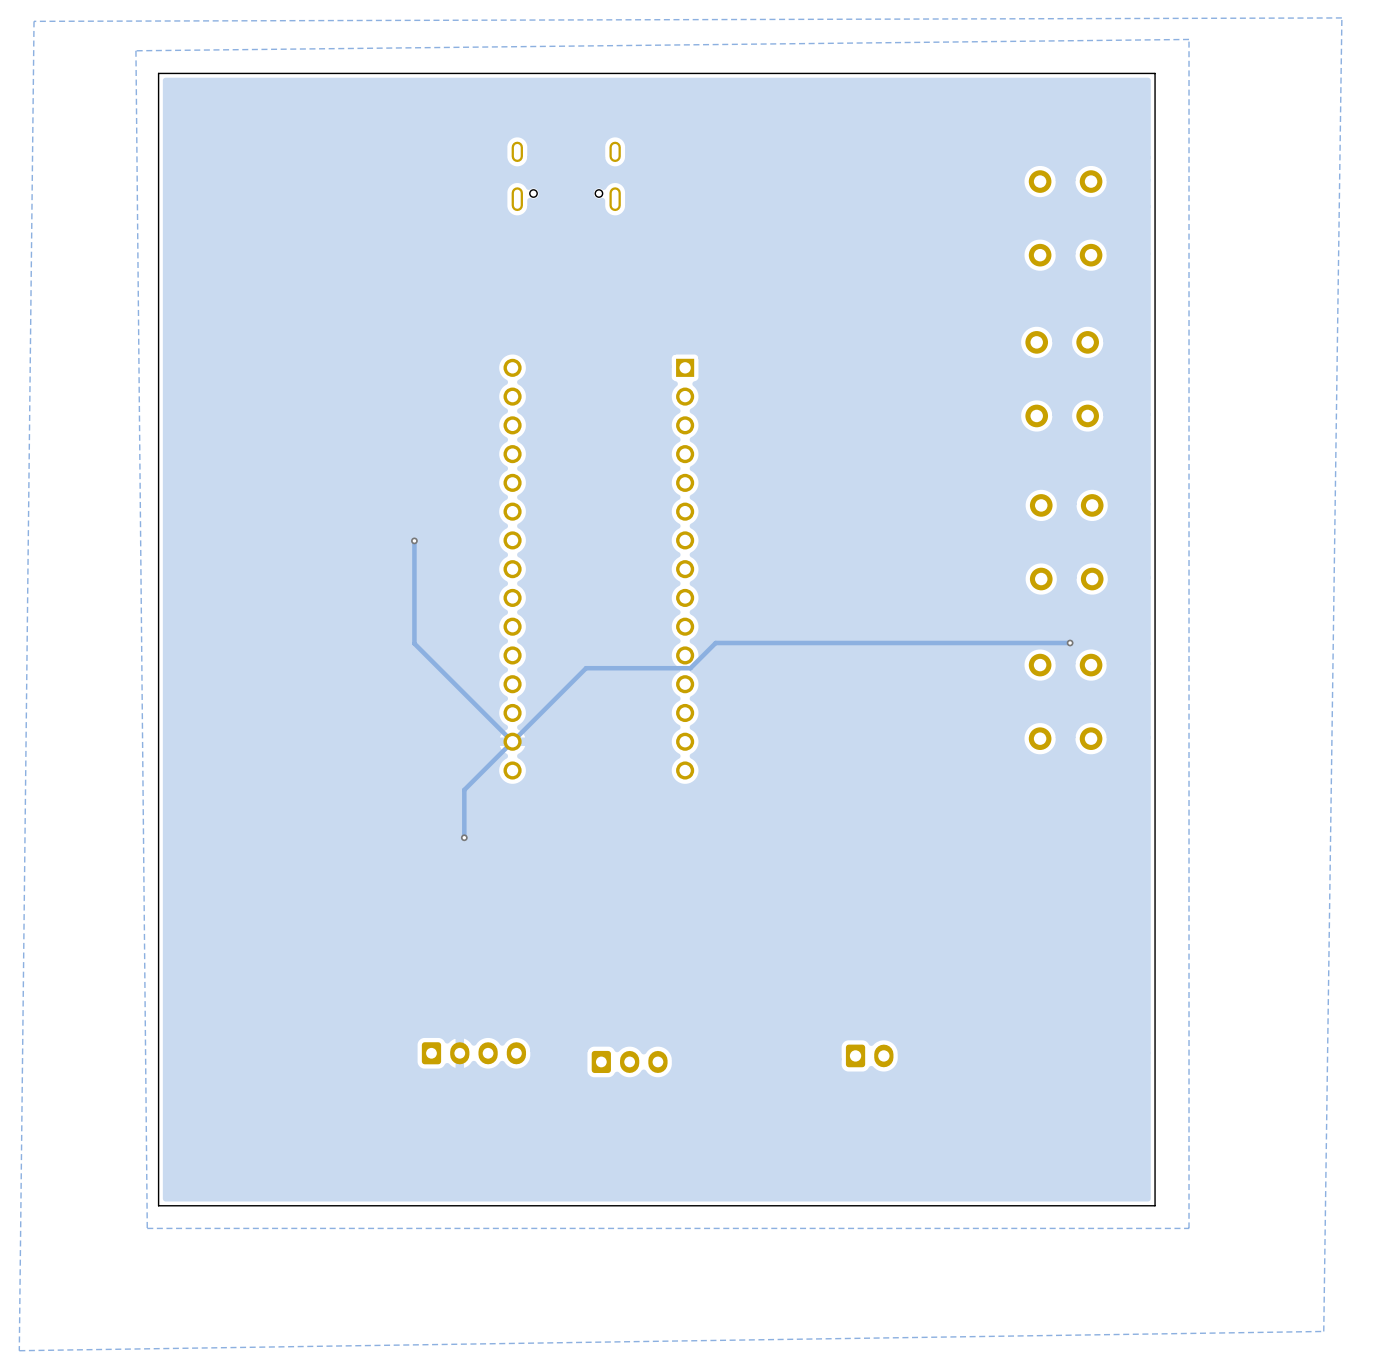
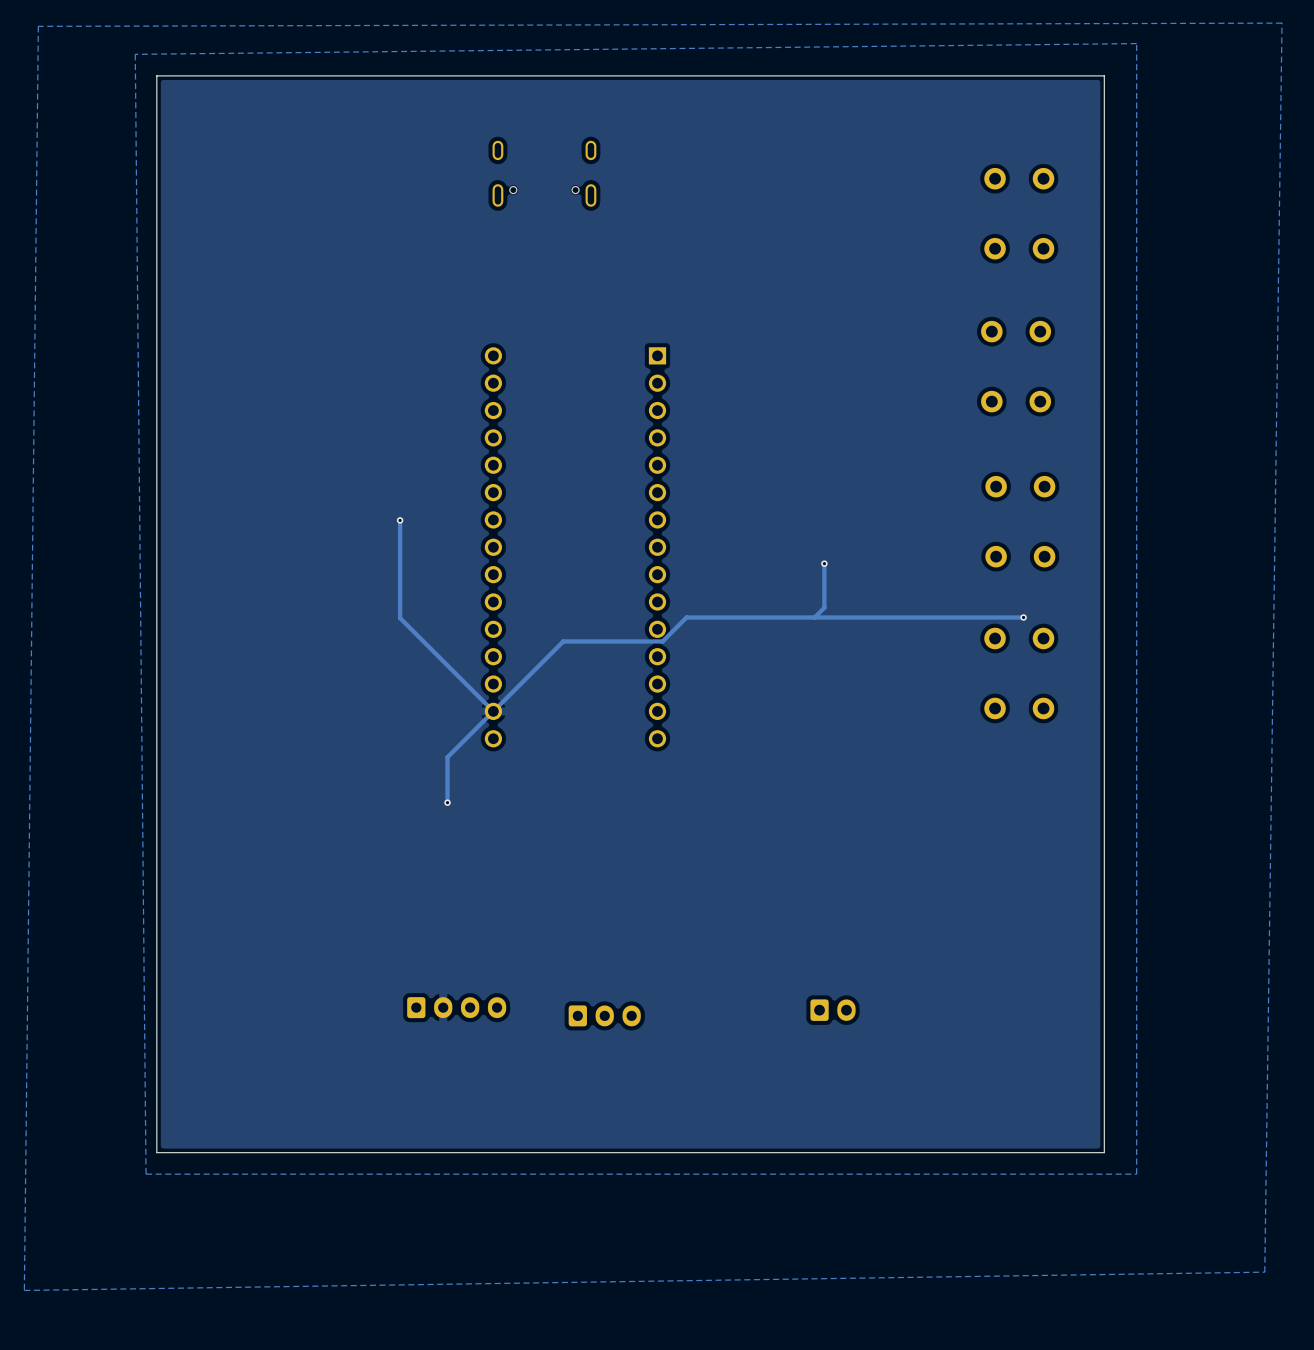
track: none -> (824, 563) (824, 607) (814, 617)
via: none -> (824, 563)

